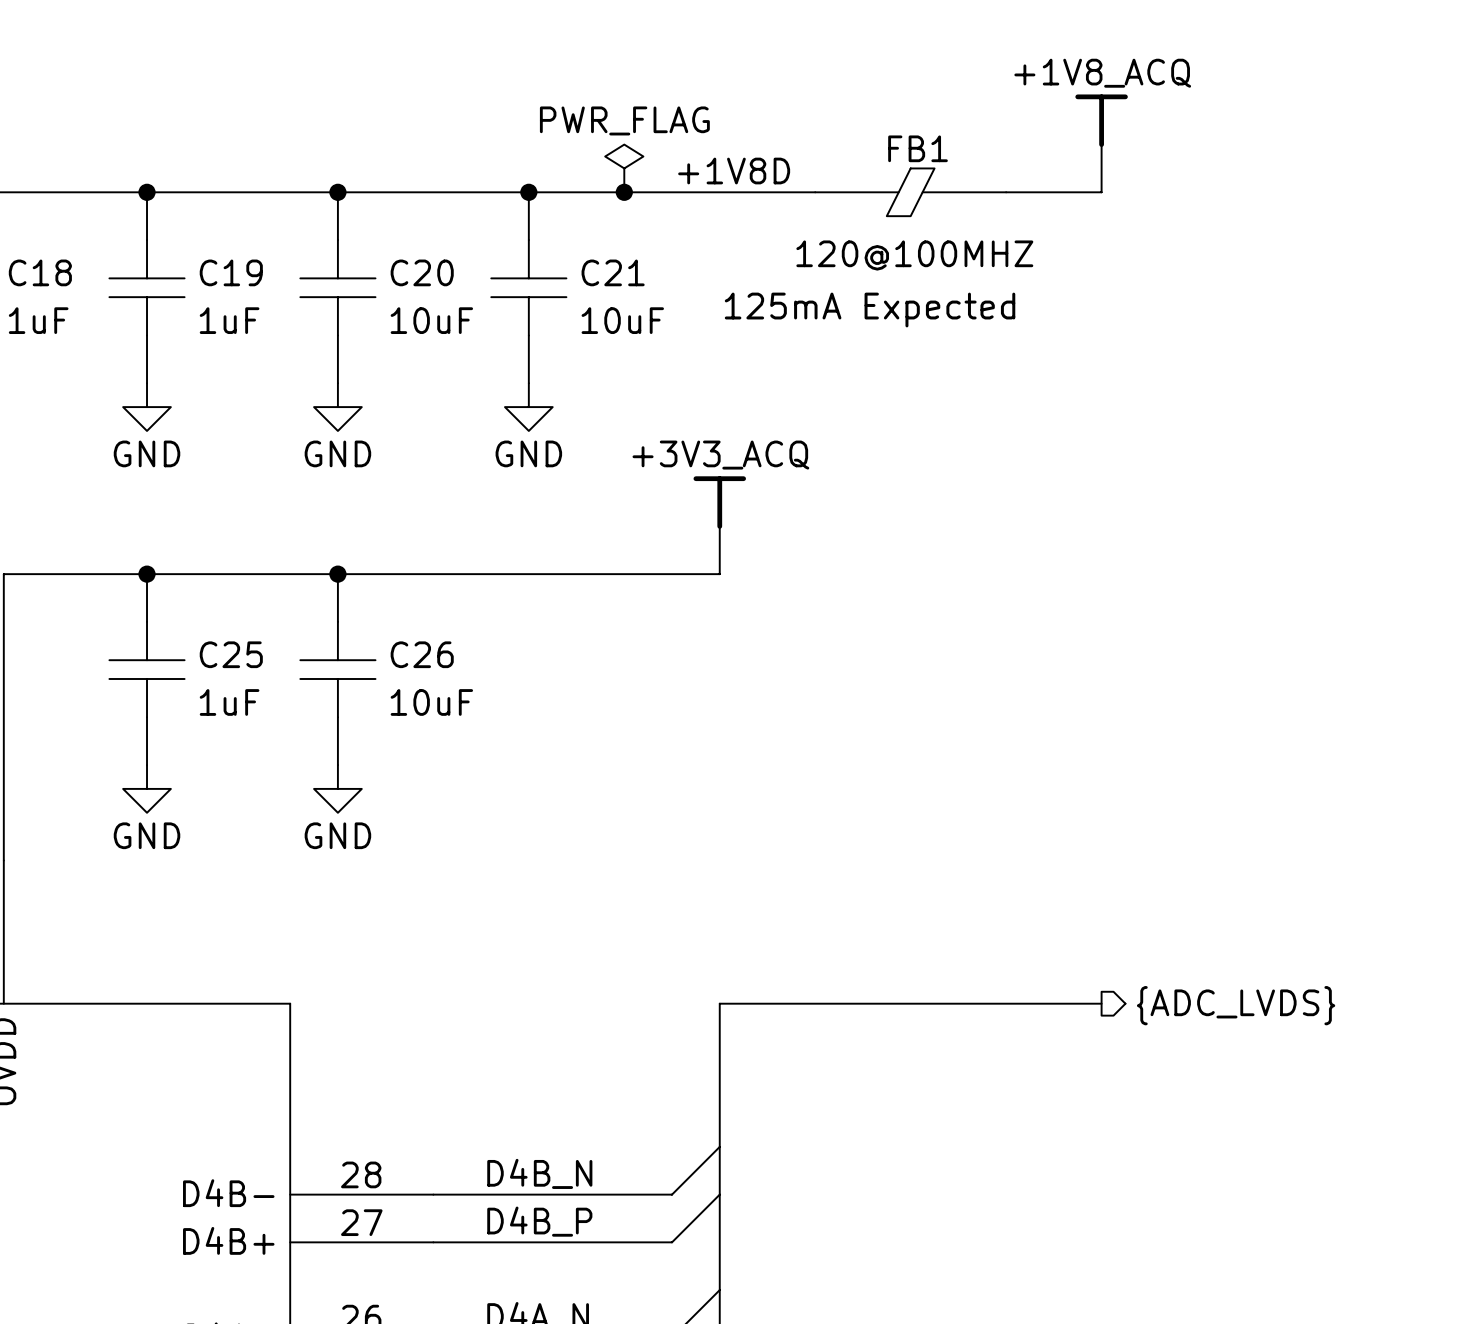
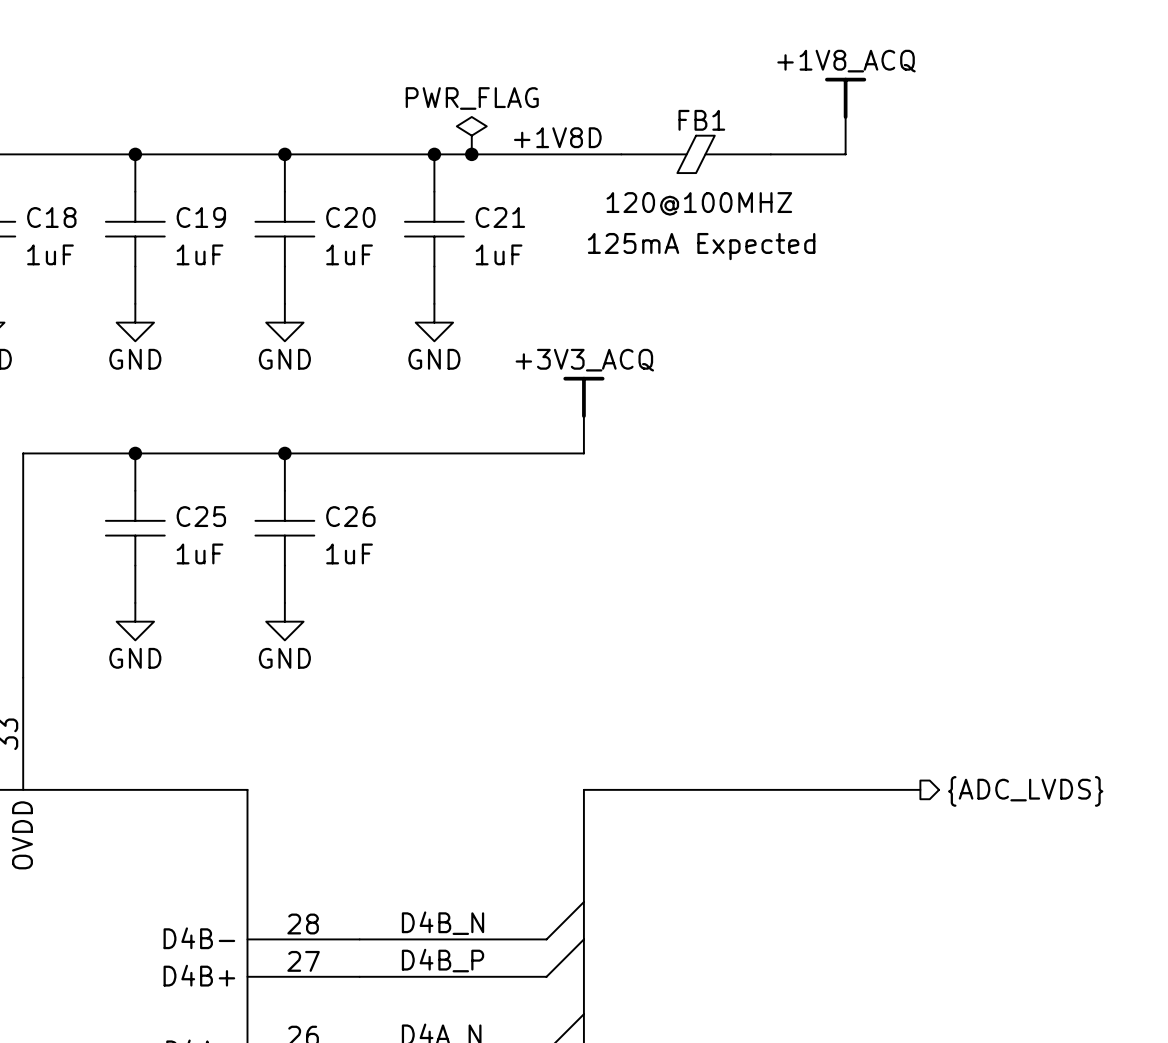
power symbol position: +1V8_ACQ (1101, 120) -> +1V8_ACQ (845, 98)
wire: (1101, 144) (1101, 192) (1053, 192) -> (845, 116) (845, 154)
power symbol position: PWR_FLAG (624, 168) -> PWR_FLAG (471, 135)
label position: +1V8D (734, 171) -> +1V8D (557, 137)
junction position: (624, 192) -> (471, 154)
FB1 position: (910, 192) -> (696, 154)
C20 value: 10uF (431, 320) -> 1uF (349, 254)
C21 value: 10uF (622, 320) -> 1uF (499, 254)
C26 value: 10uF (431, 702) -> 1uF (349, 553)
bus: none -> (883, 789) (920, 789)
hierarchical label position: {ADC_LVDS} (1236, 1005) -> {ADC_LVDS} (1025, 791)

